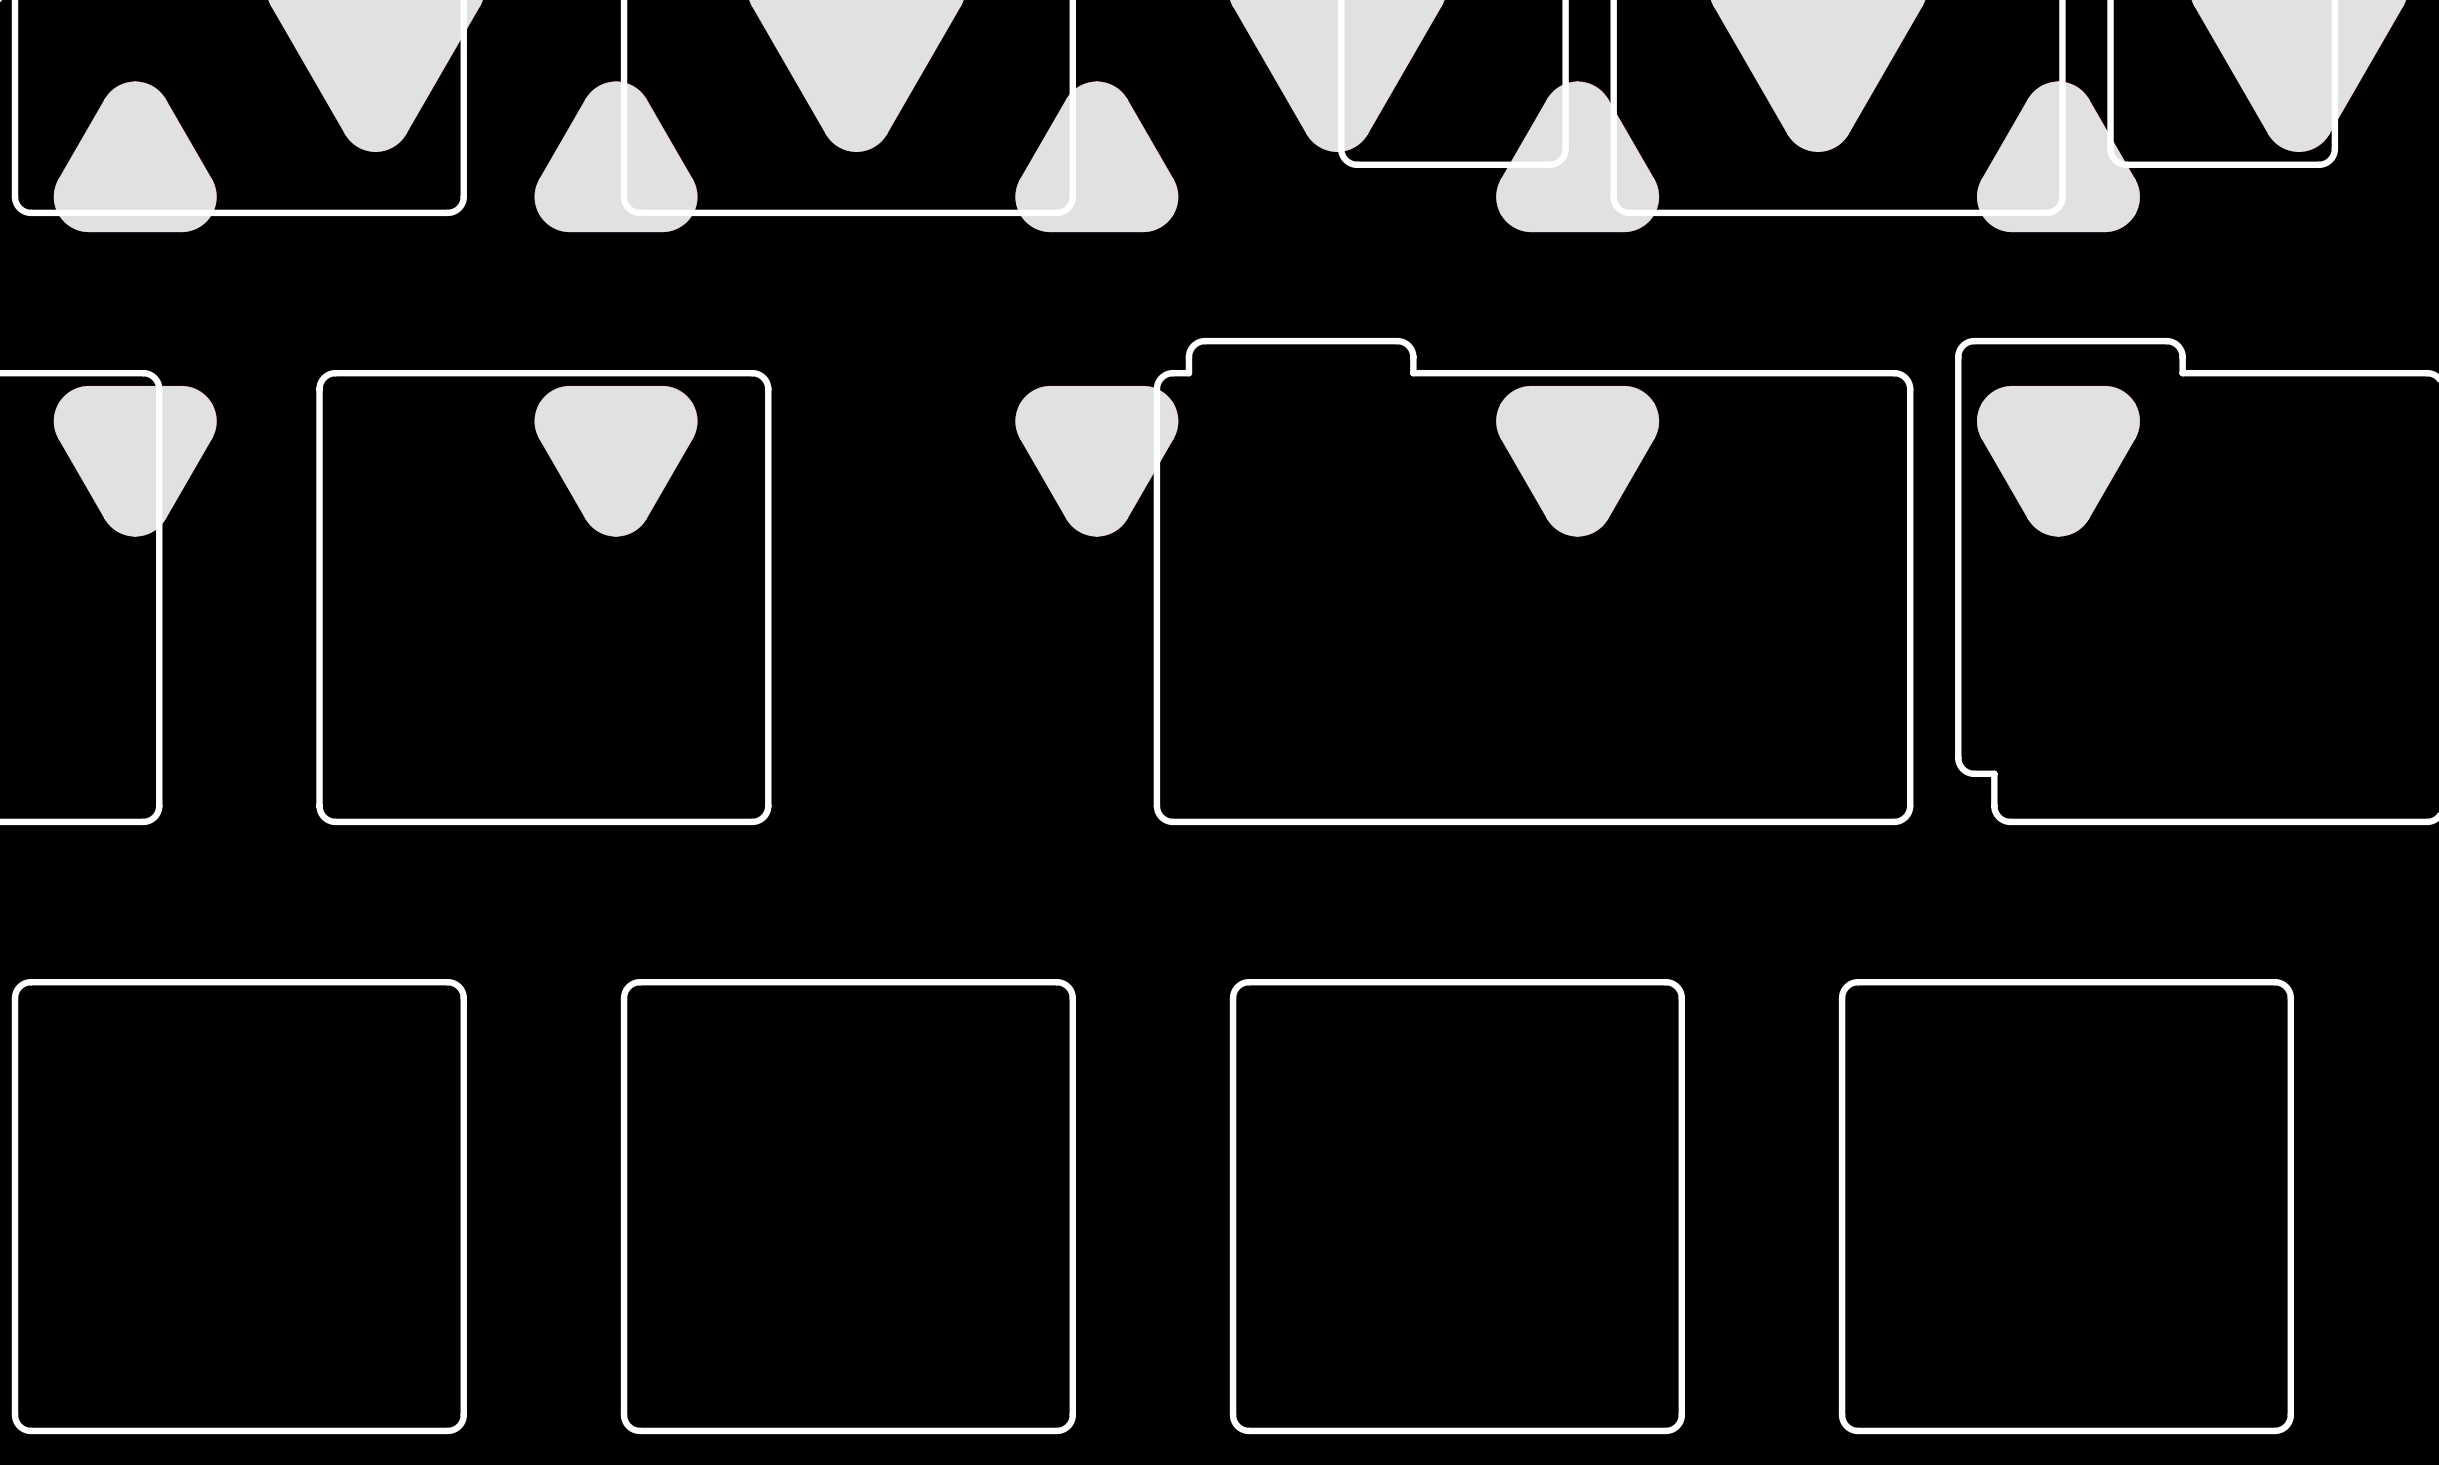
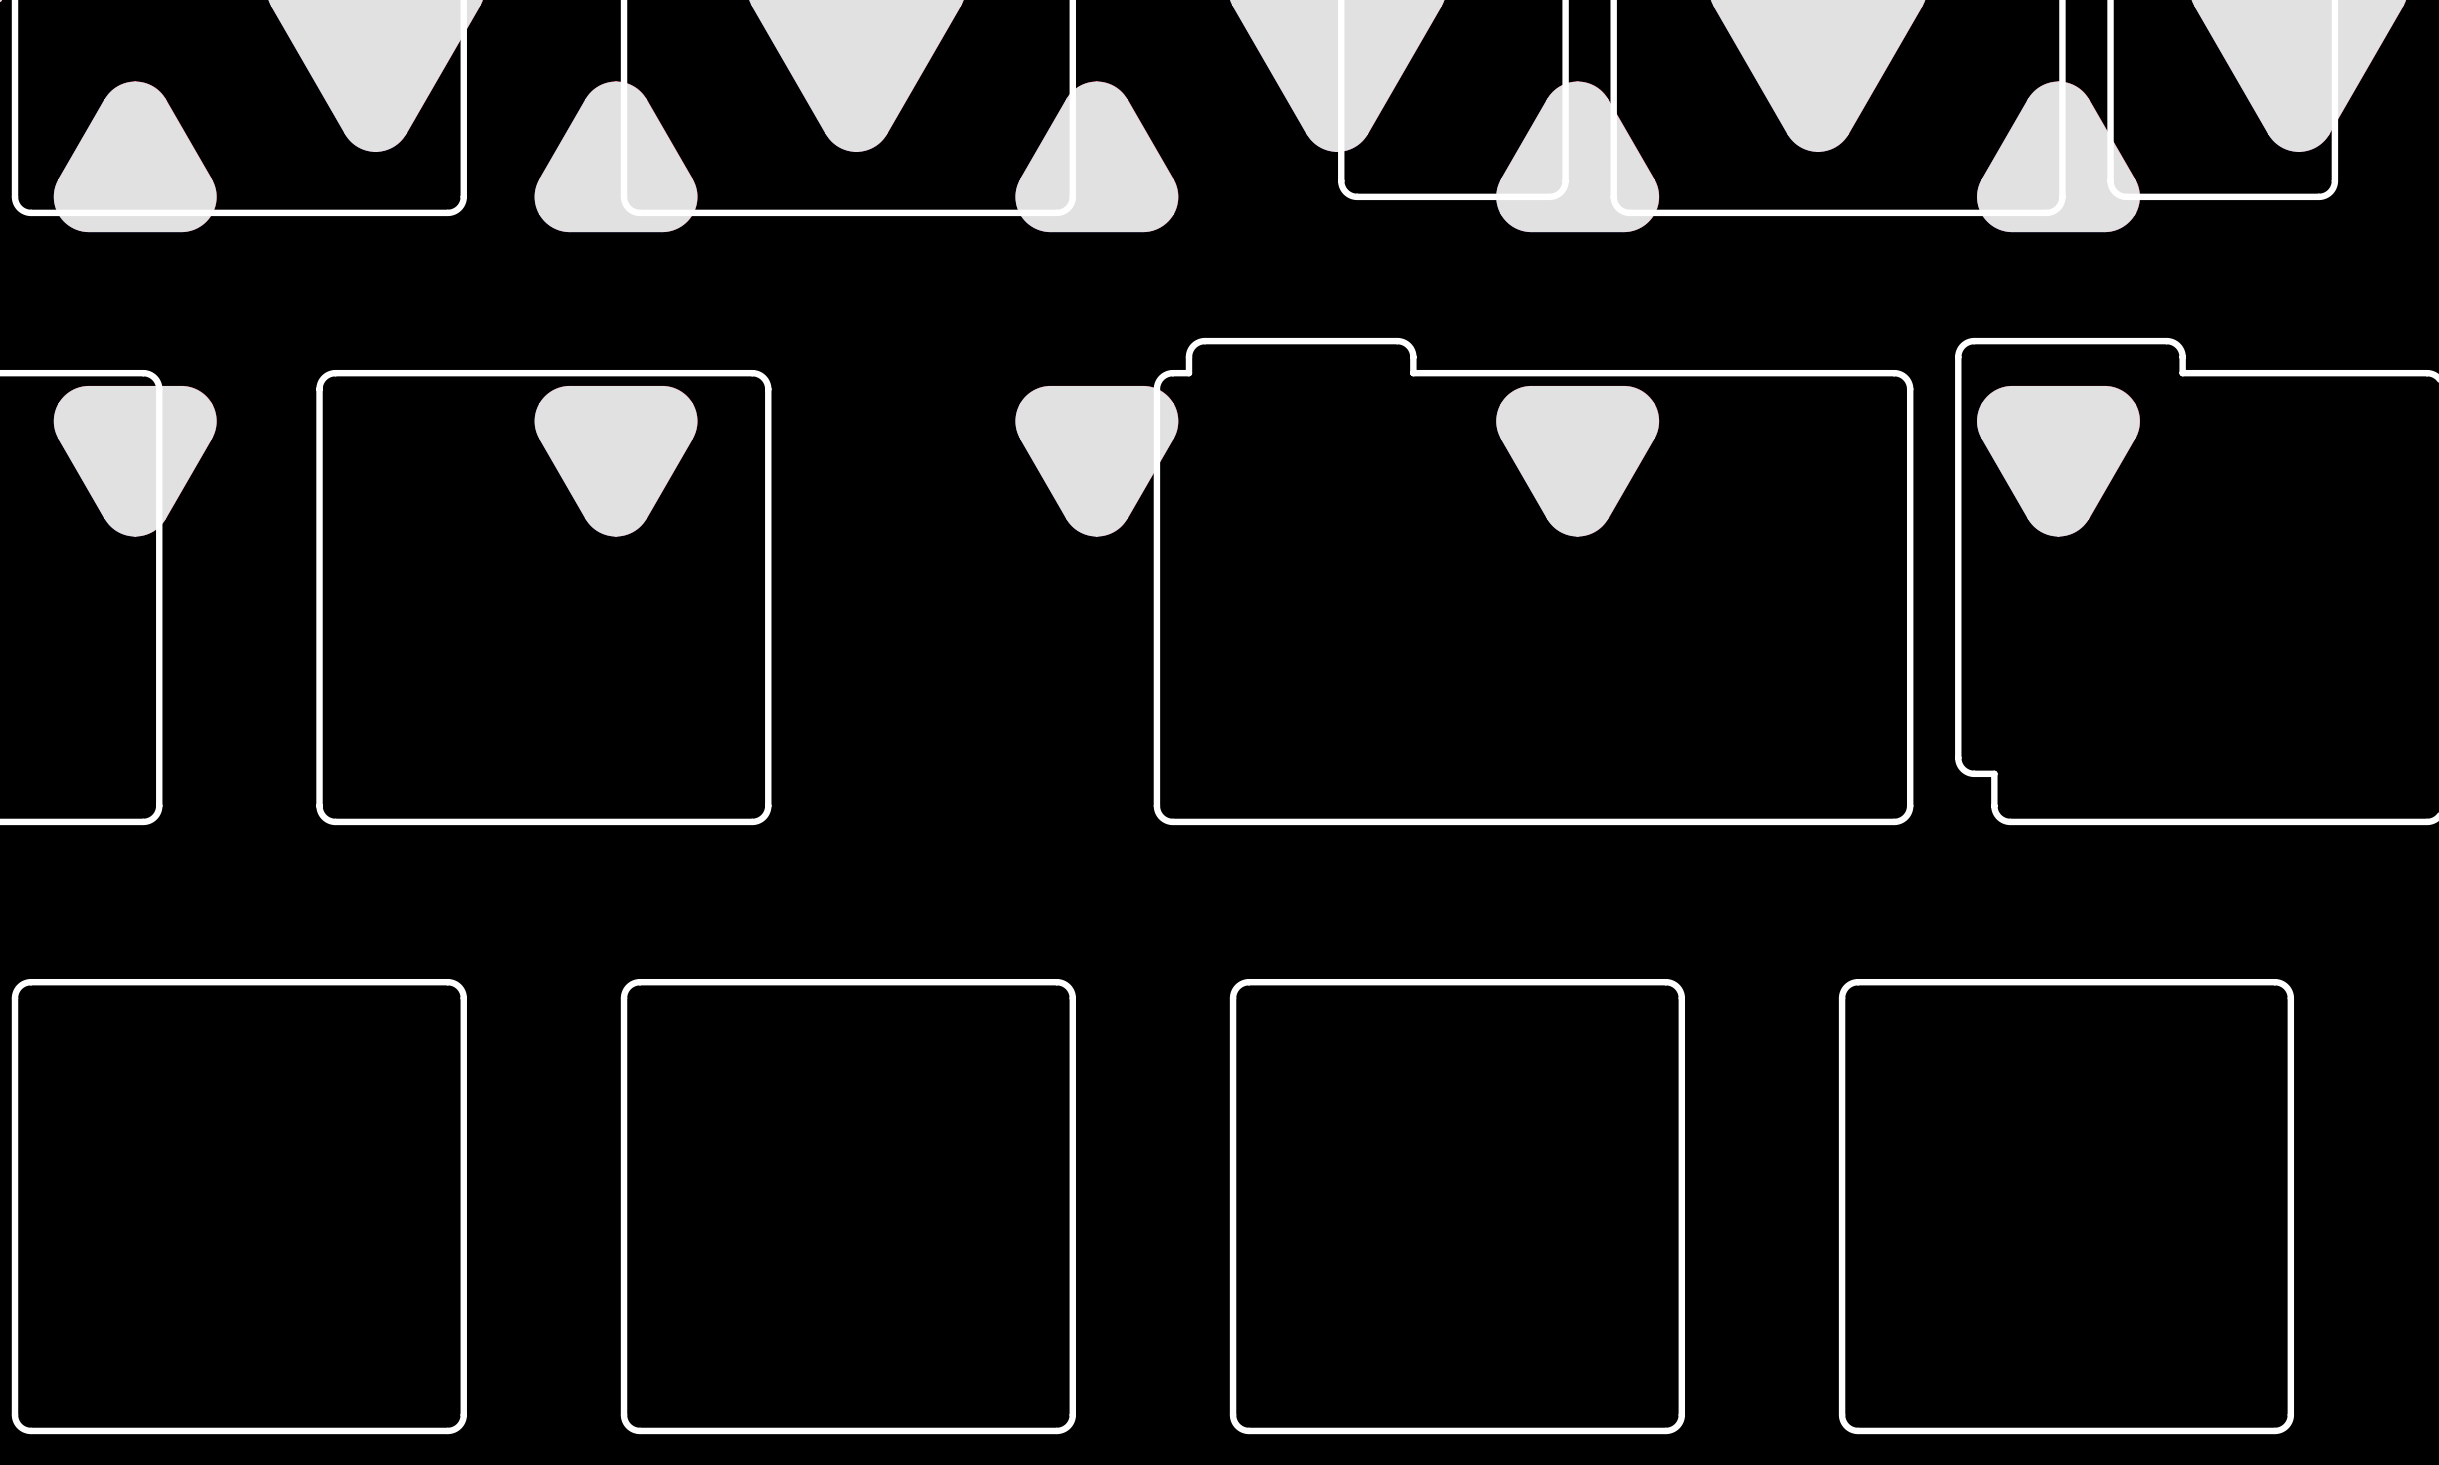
board edge: (1341, 148) (1345, 160) (1357, 164) (1551, 164) (1561, 158) (1565, 148) -> (1341, 148) (1341, 185) (1348, 194) (1357, 196) (1552, 196) (1559, 193) (1564, 185) (1565, 148)
board edge: (2110, 148) (2115, 160) (2126, 164) (2320, 164) (2331, 158) (2334, 148) -> (2110, 148) (2111, 185) (2117, 194) (2126, 196) (2322, 196) (2329, 193) (2334, 185) (2334, 148)

